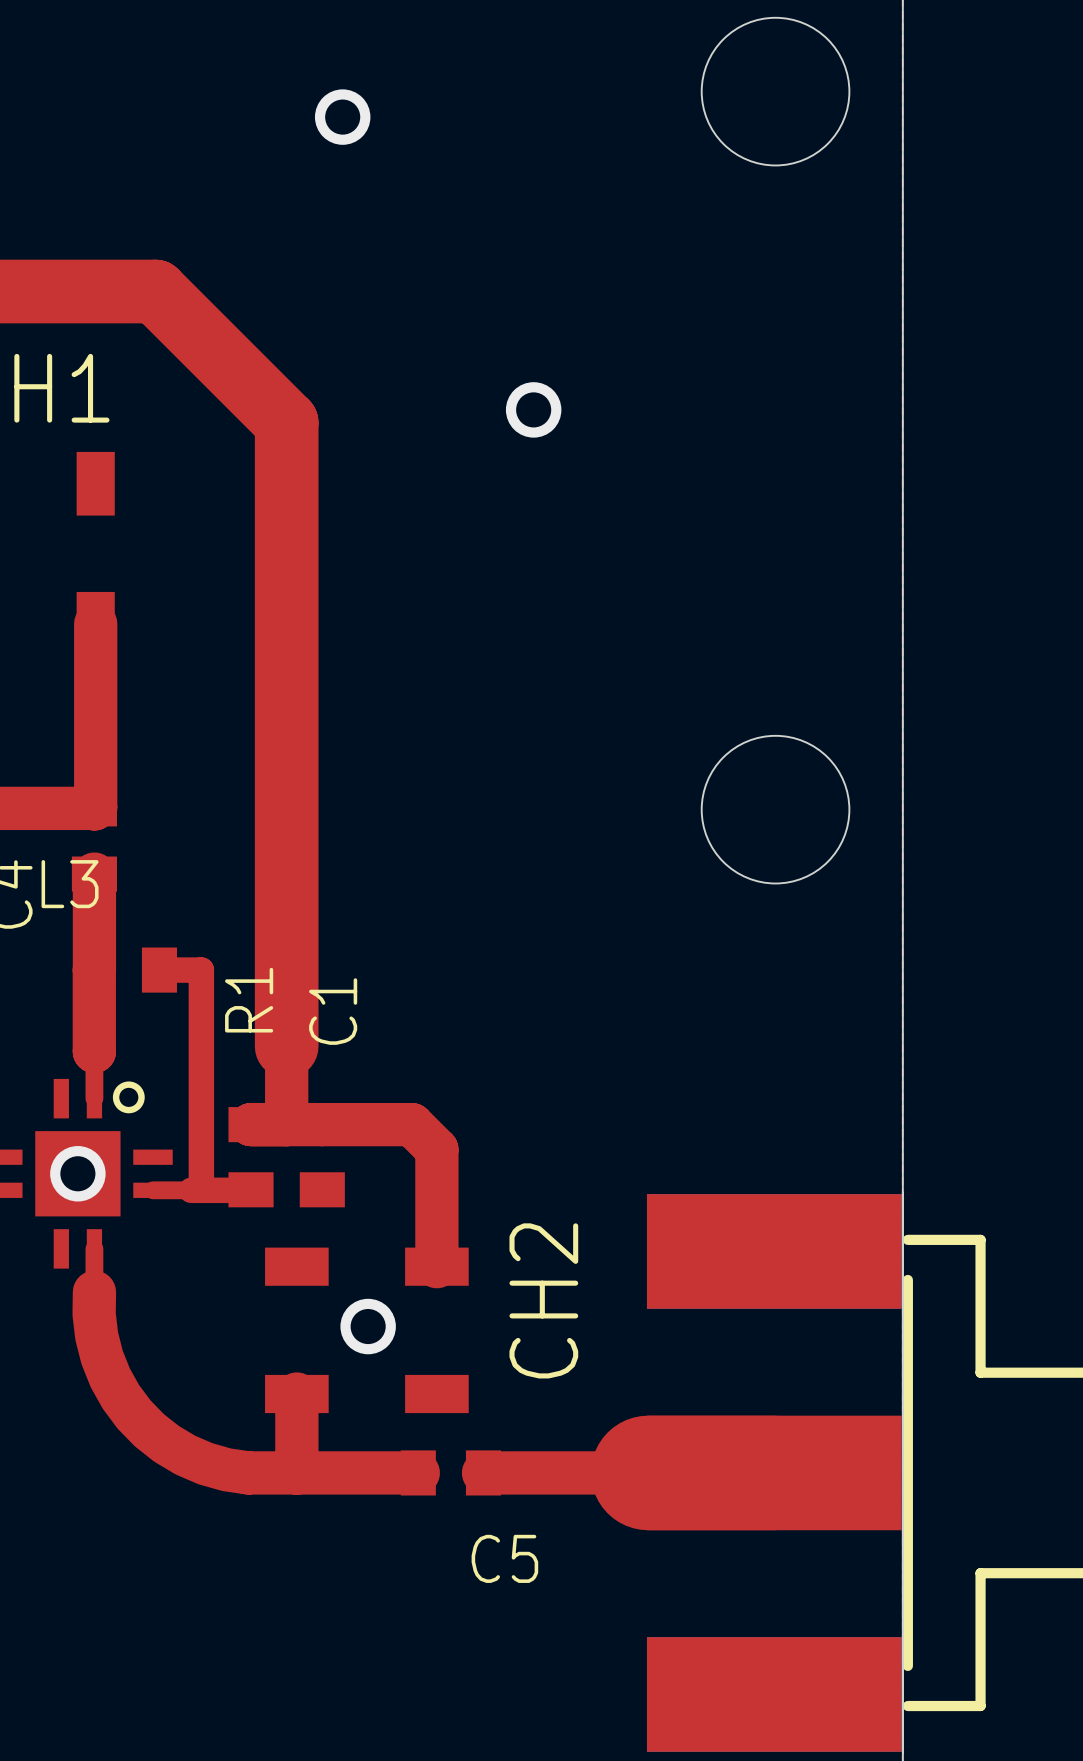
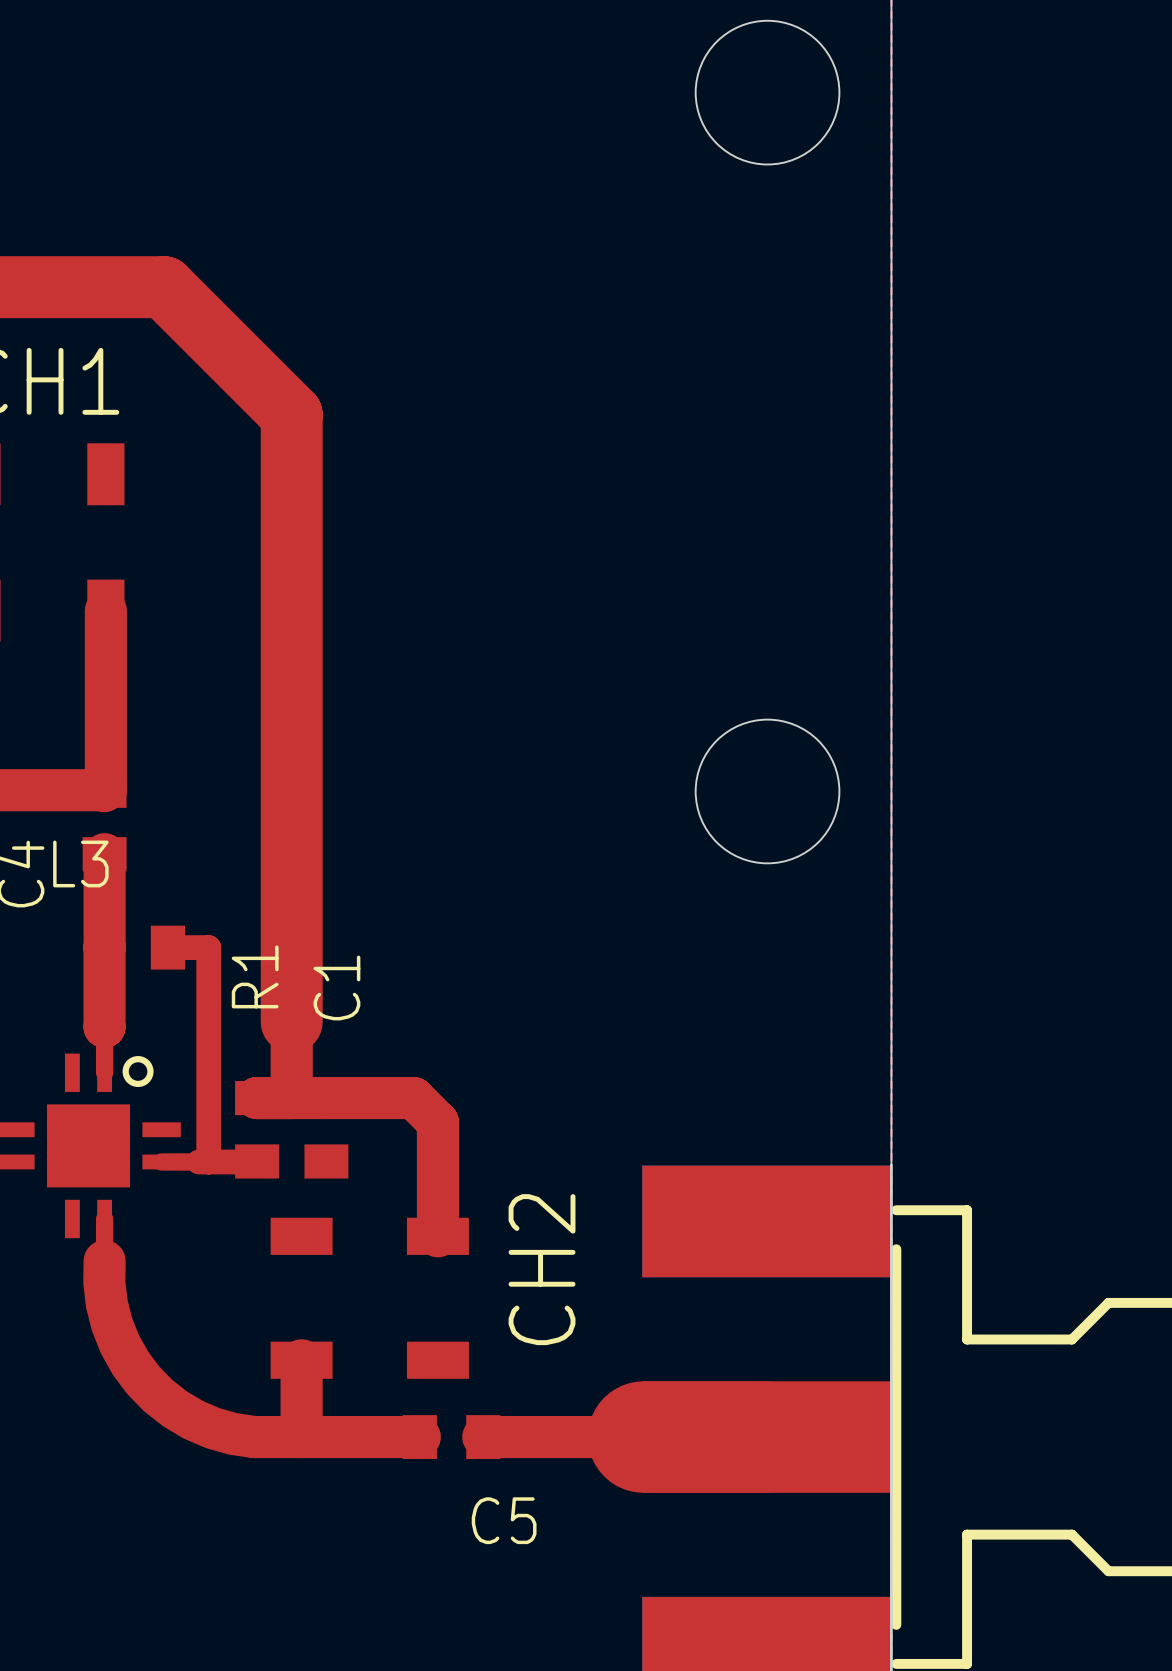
via: (342, 117) -> none
via: (533, 409) -> none
via: (77, 1173) -> none
via: (368, 1326) -> none

